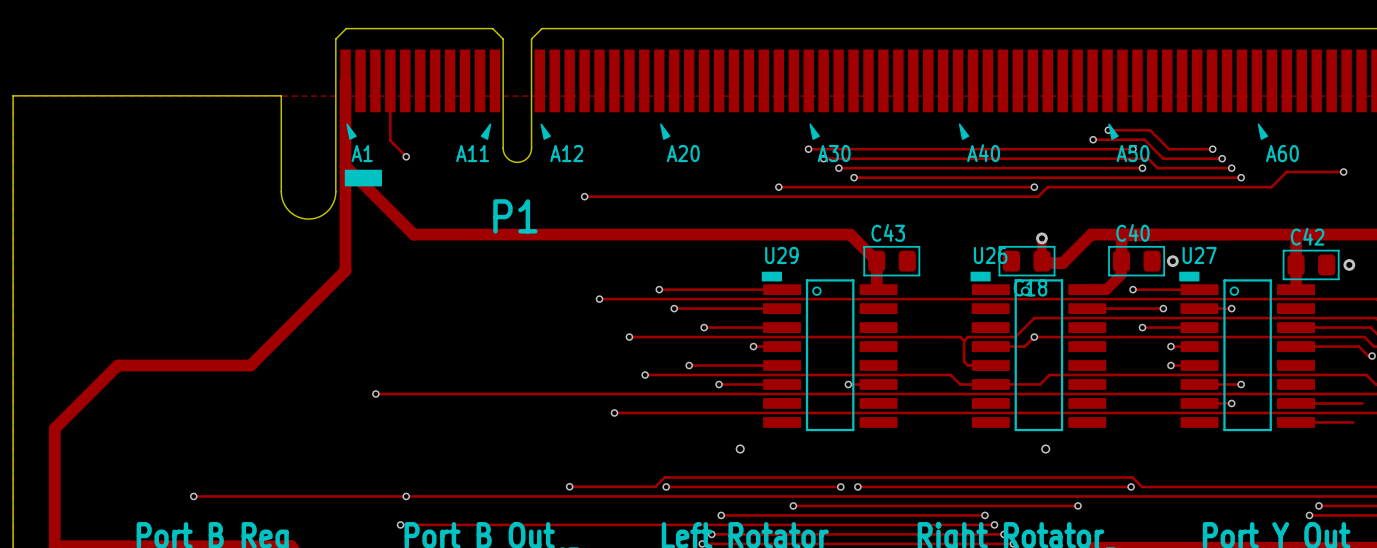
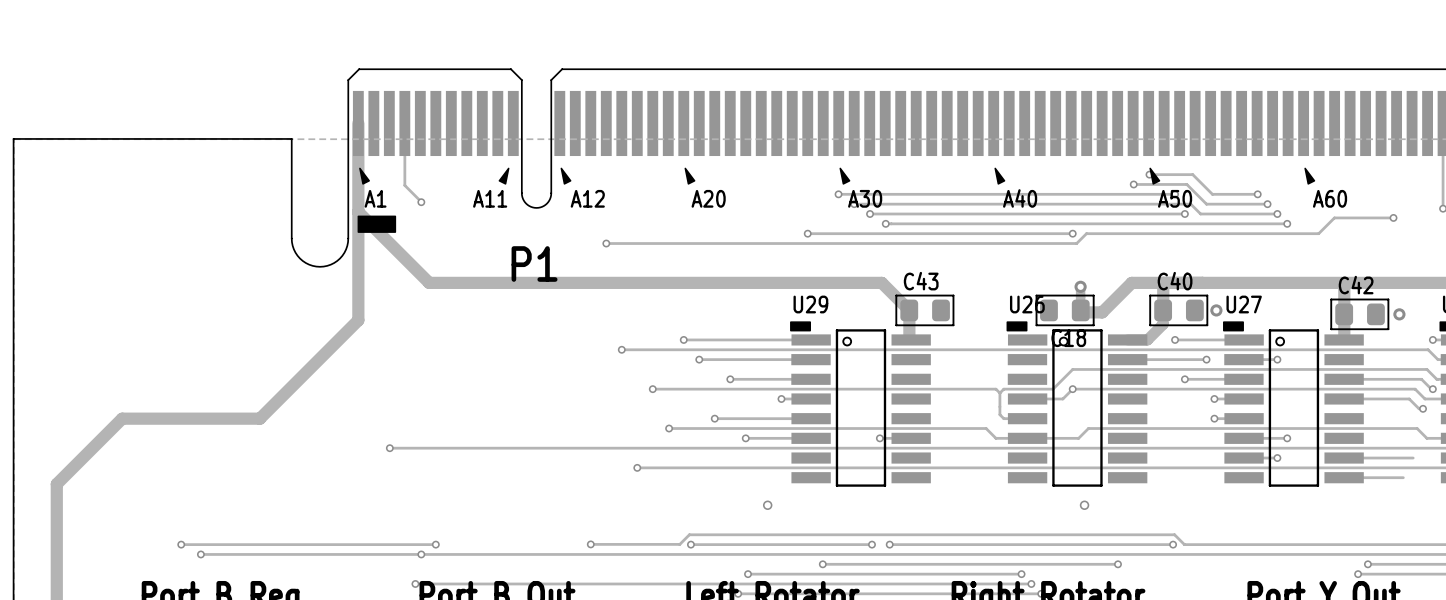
track: none -> (181, 544) (435, 544)
via: none -> (181, 544)
via: none -> (435, 544)

